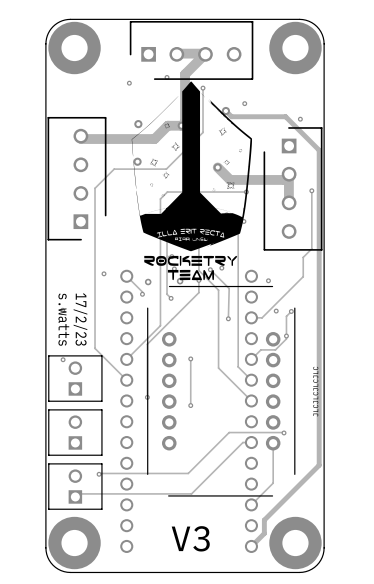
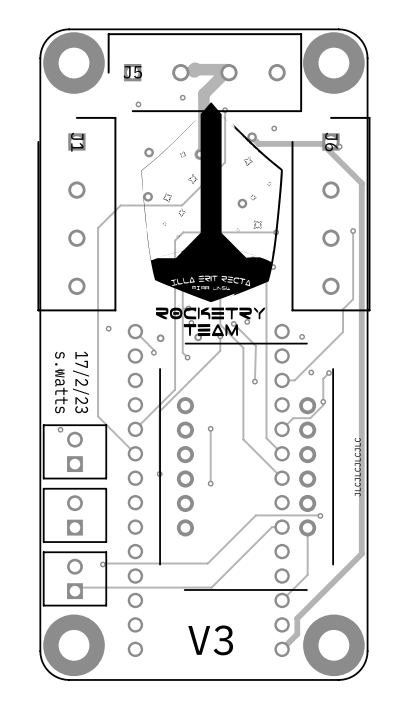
part: (191, 50) -> none
J5: none -> (204, 72)
track: (181, 125) (167, 125) (154, 139) (81, 139) -> none
track: (217, 167) (230, 179) (284, 179) (289, 174) (288, 204) -> none
J1: none -> (76, 214)
J6: none -> (330, 214)
part: (77, 178) -> none
part: (293, 188) -> none

